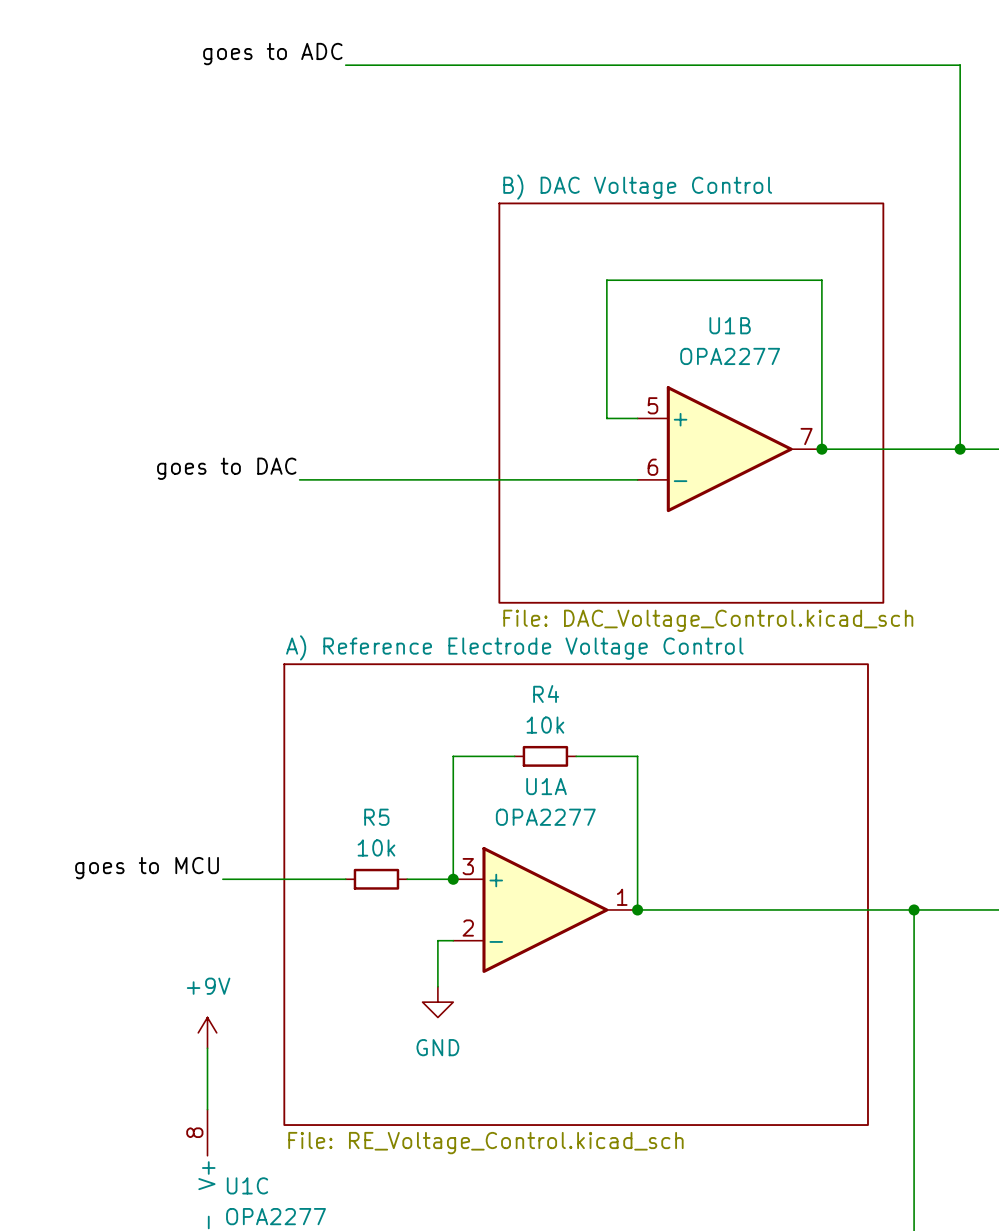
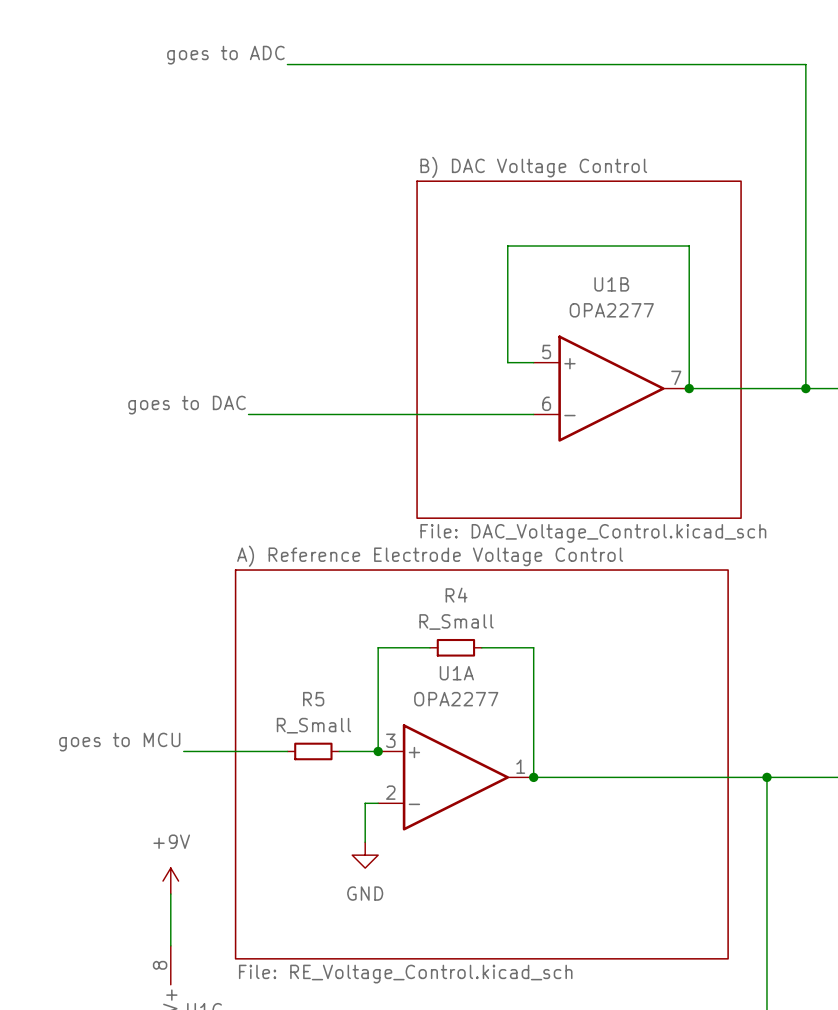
R4 value: 10k (545, 725) -> R_Small (456, 621)
R5 value: 10k (376, 847) -> R_Small (313, 725)

